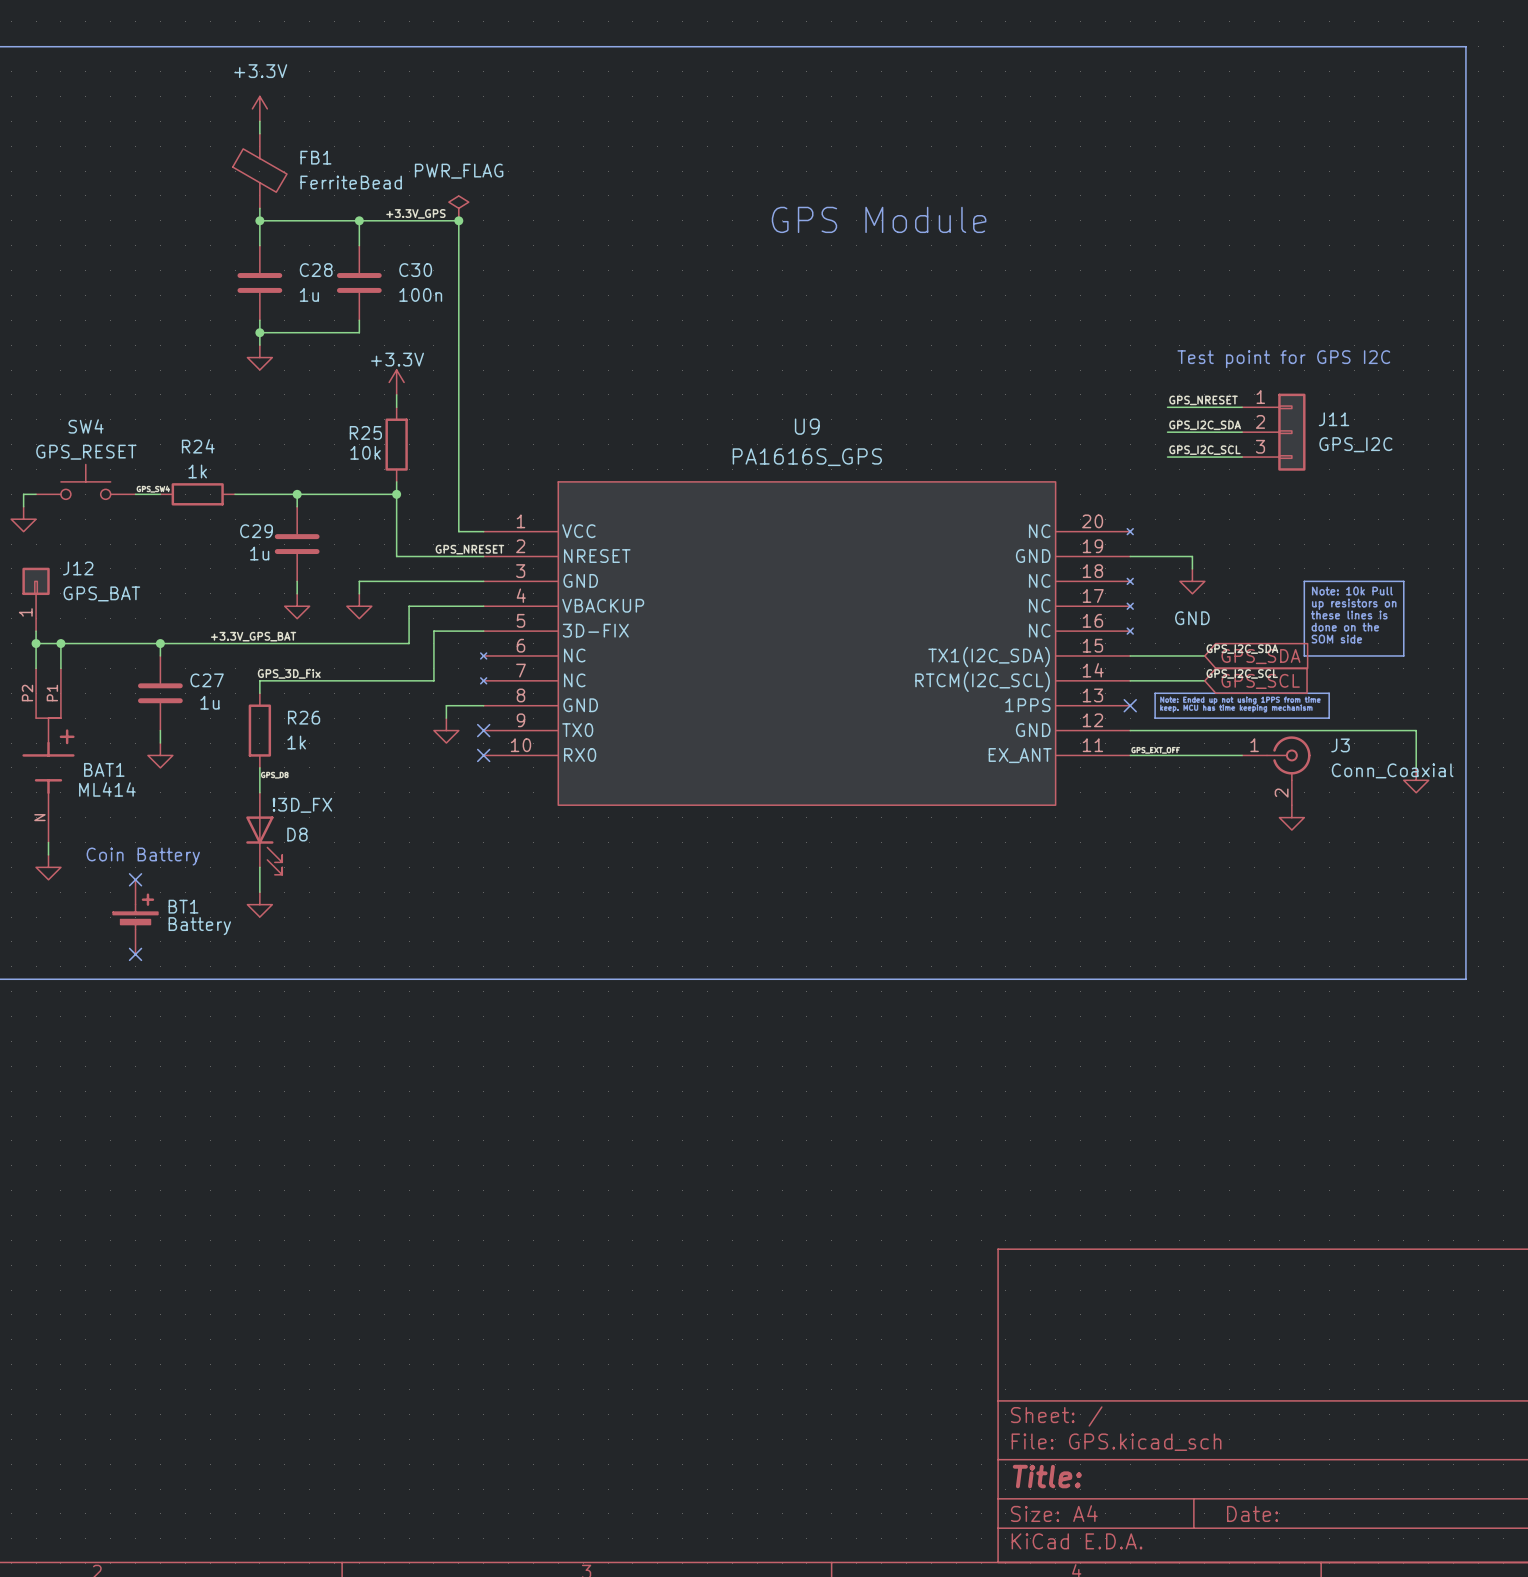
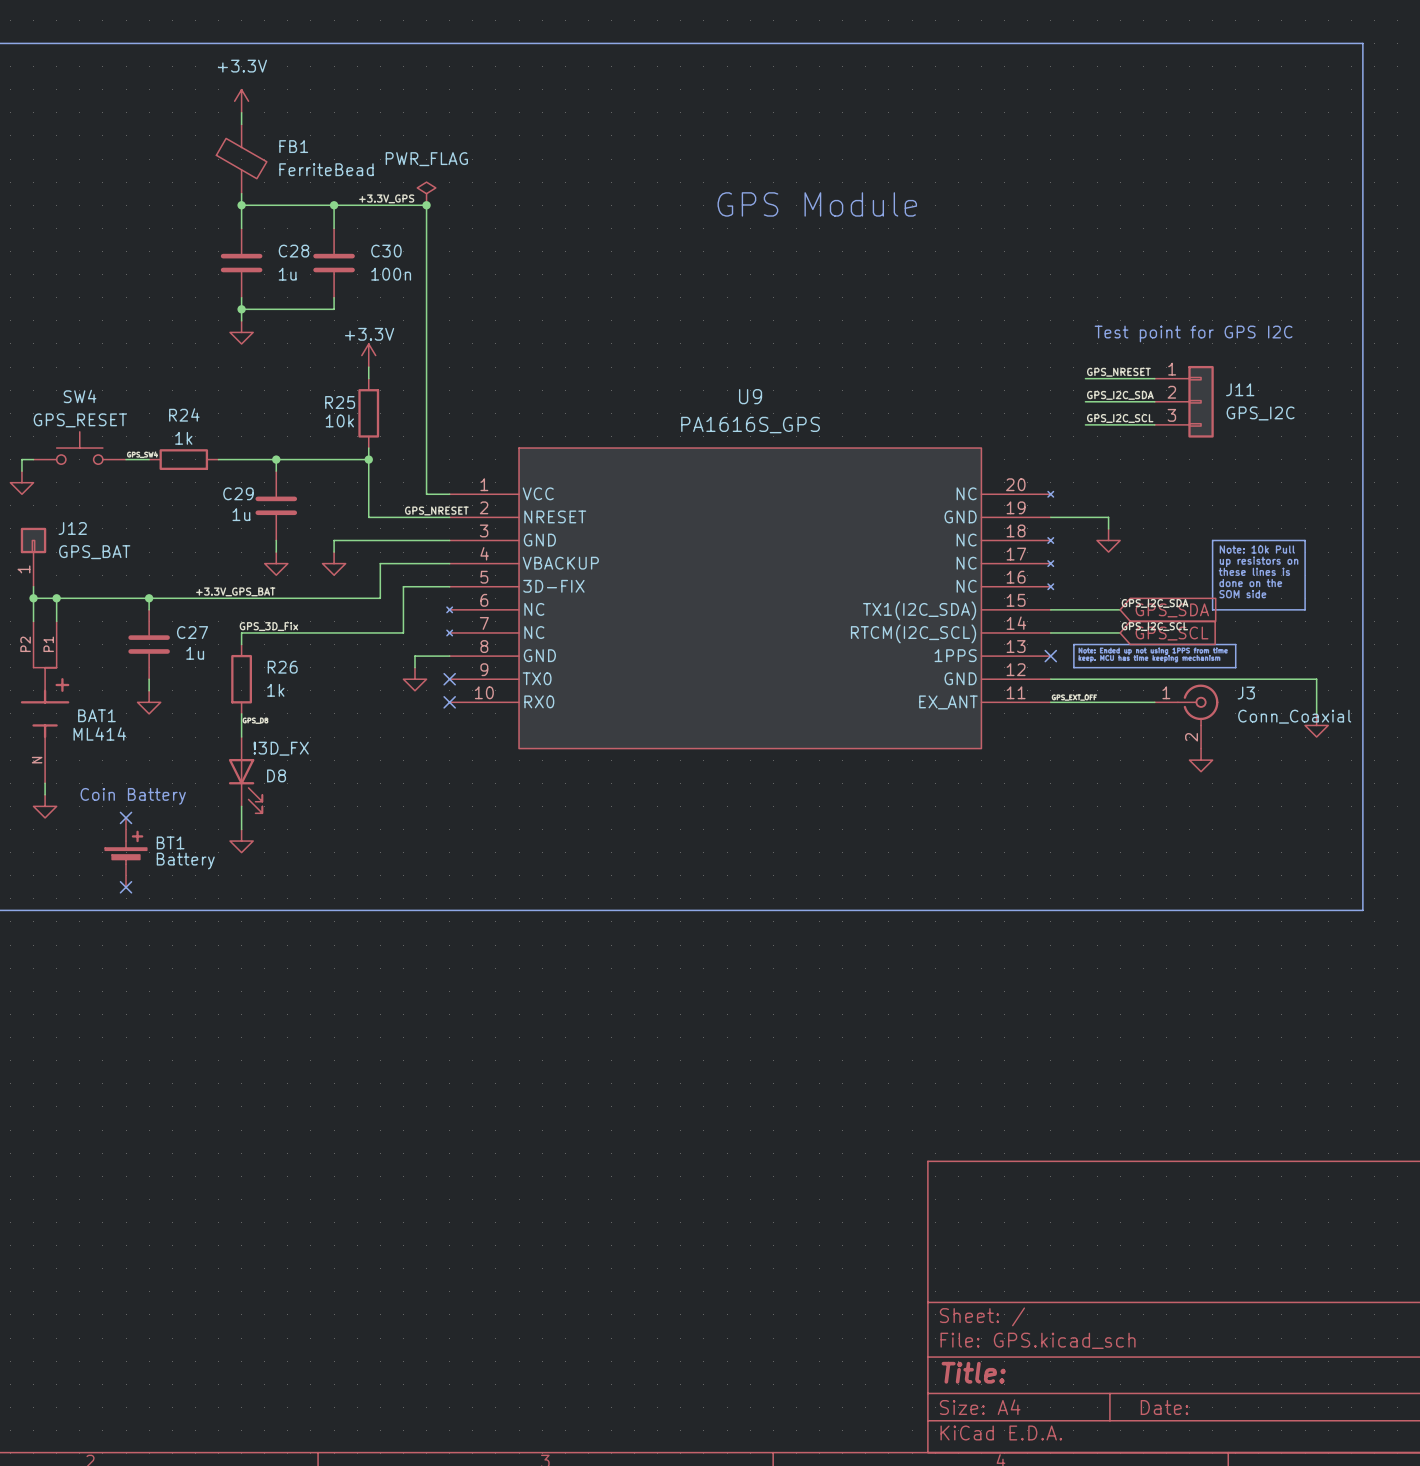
power symbol text: GND (1192, 618) -> none

